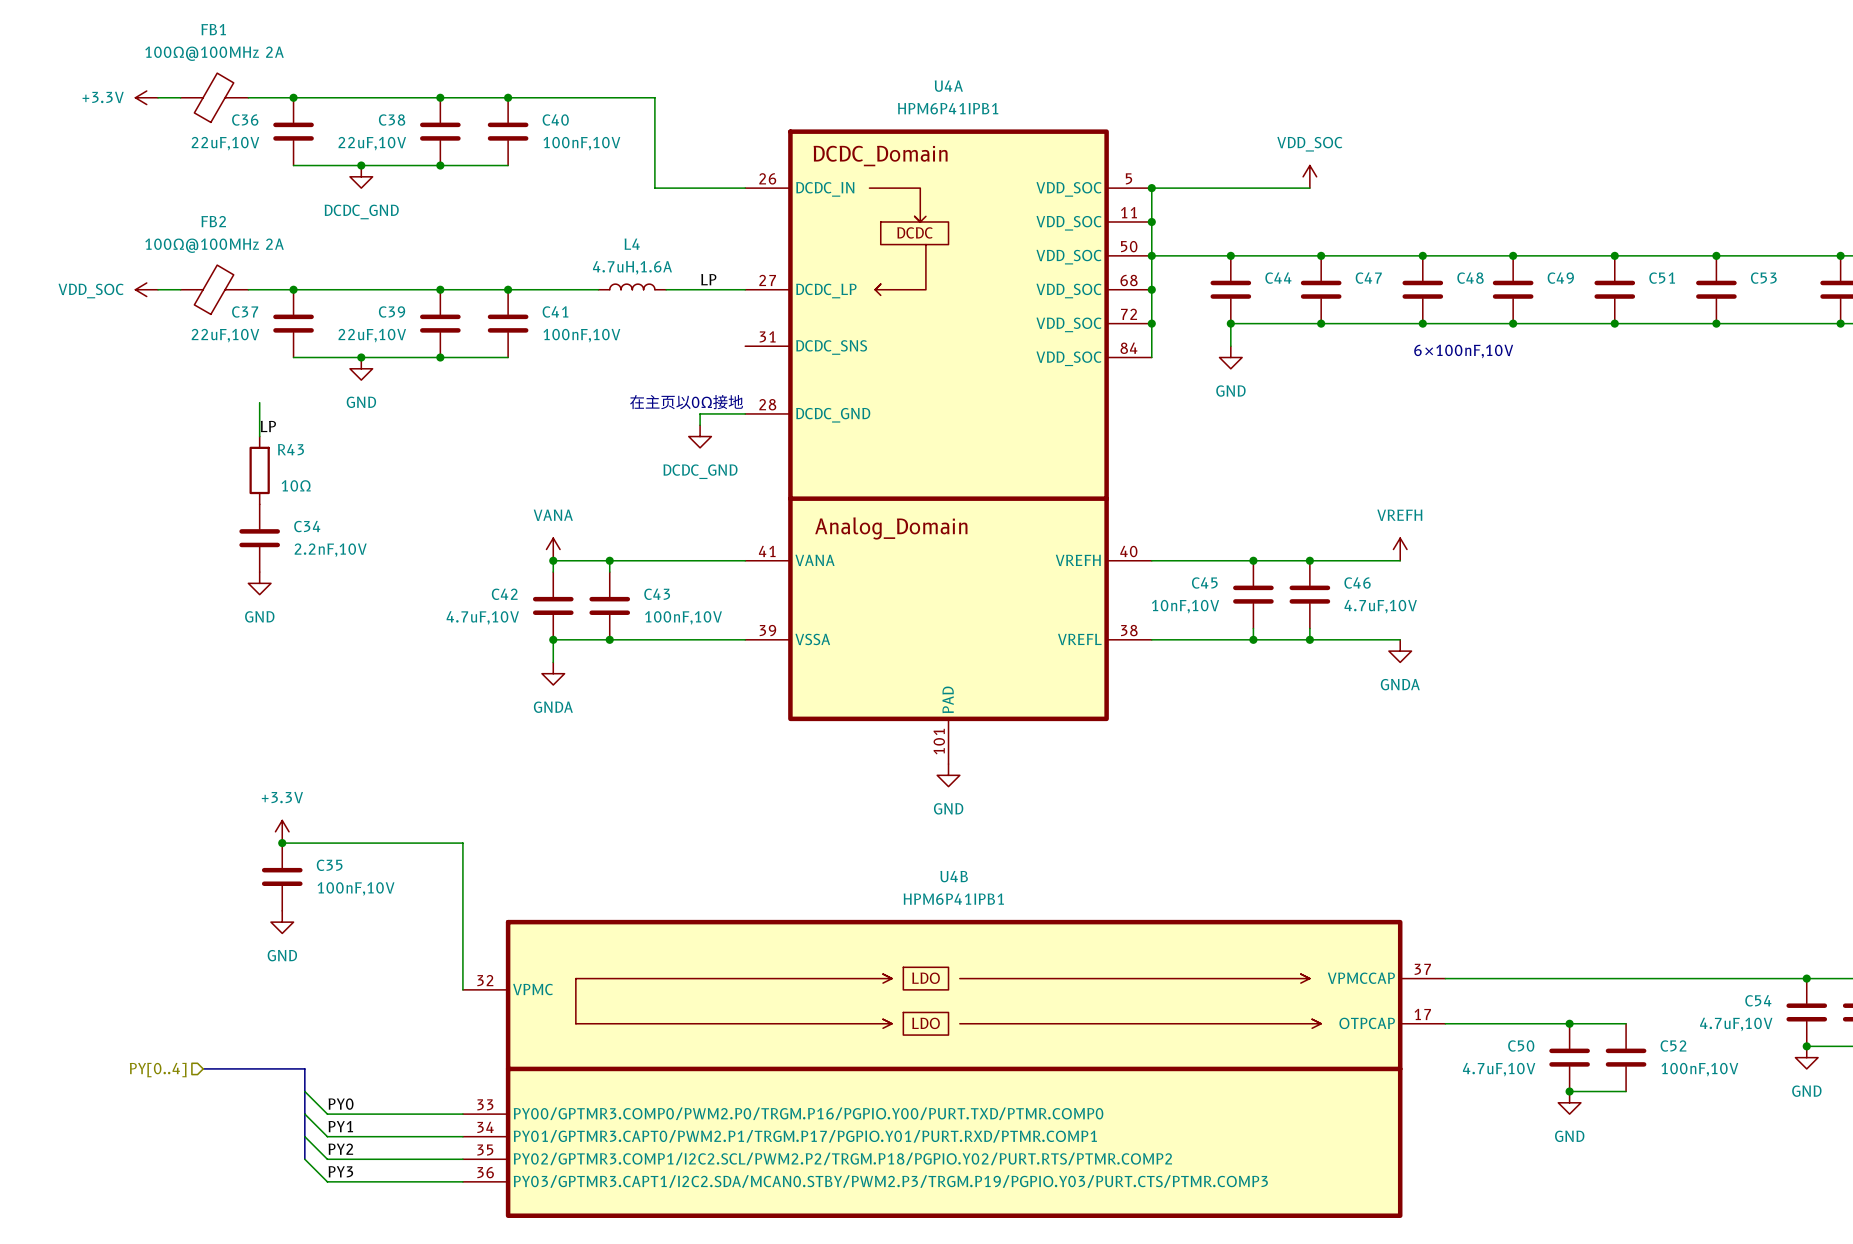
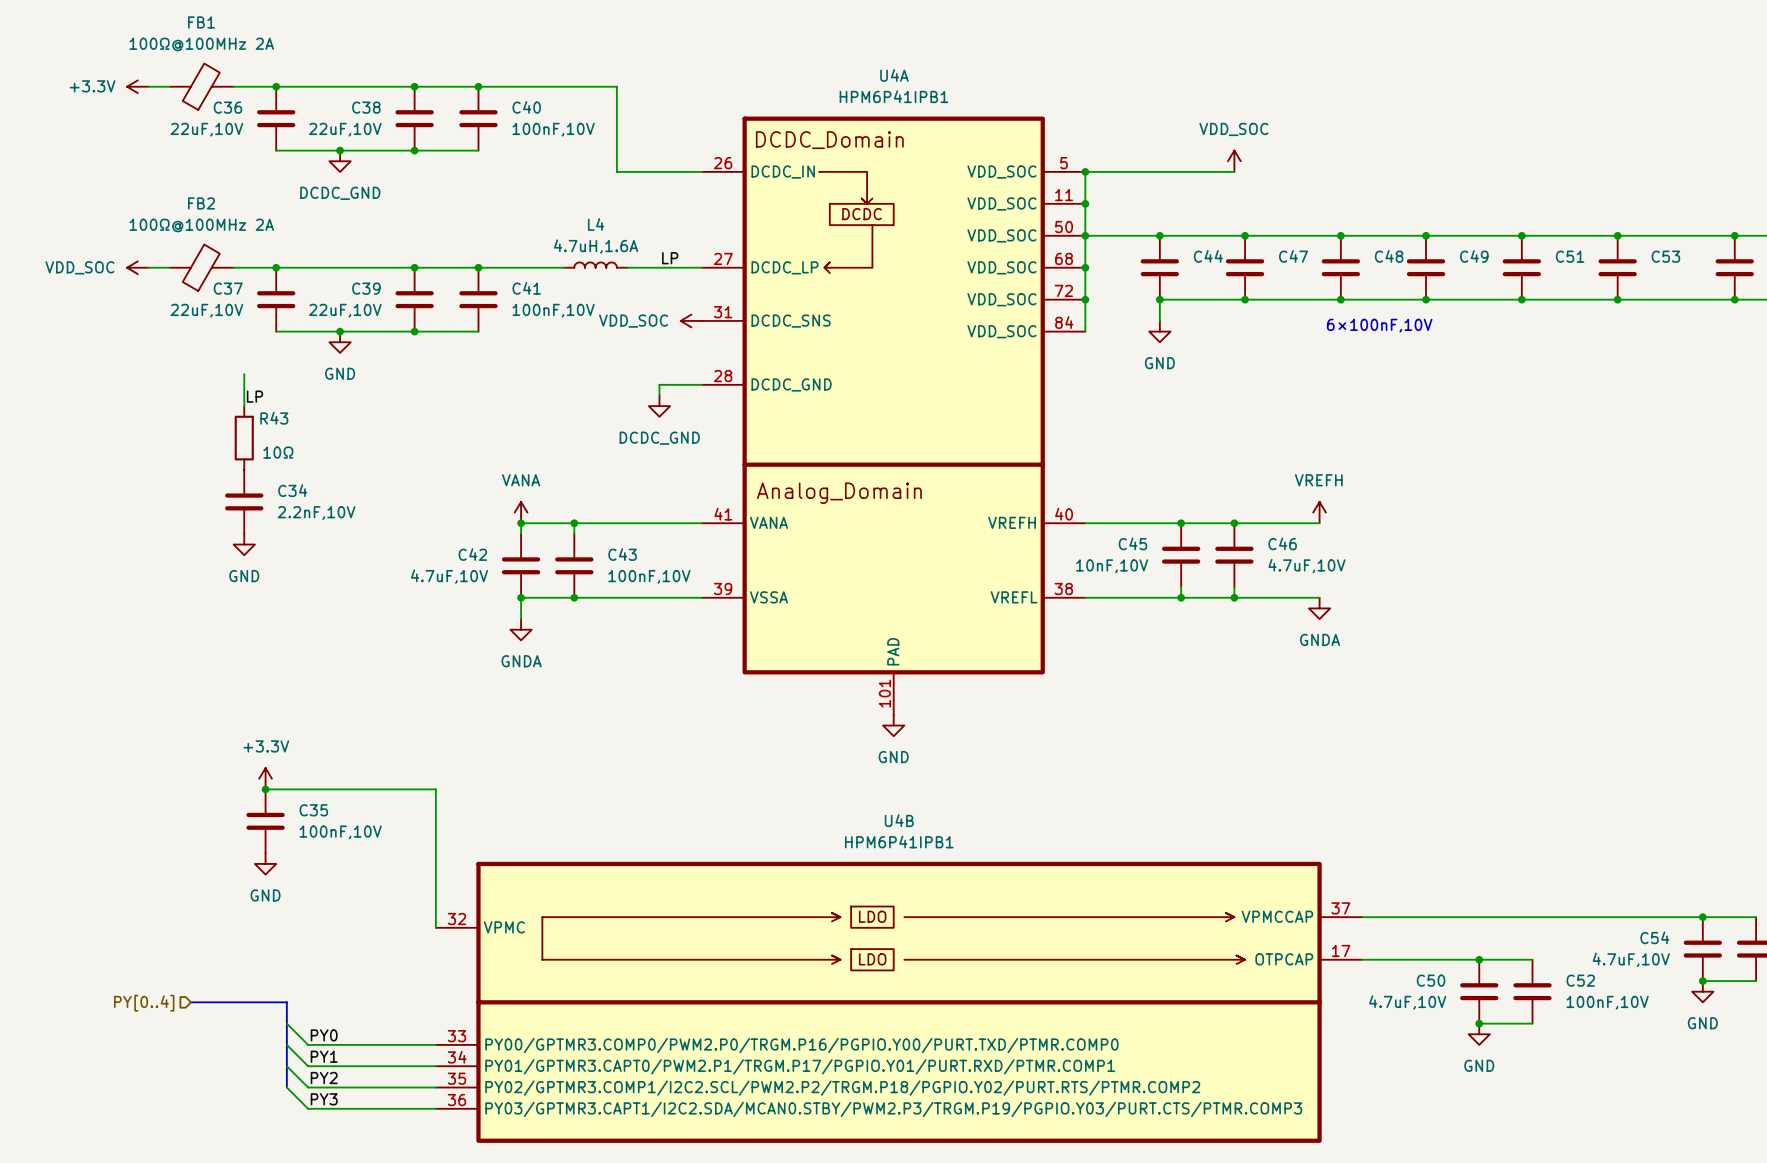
power symbol: none -> VDD_SOC (691, 320)
text: 在主页以0Ω接地 (686, 402) -> none

